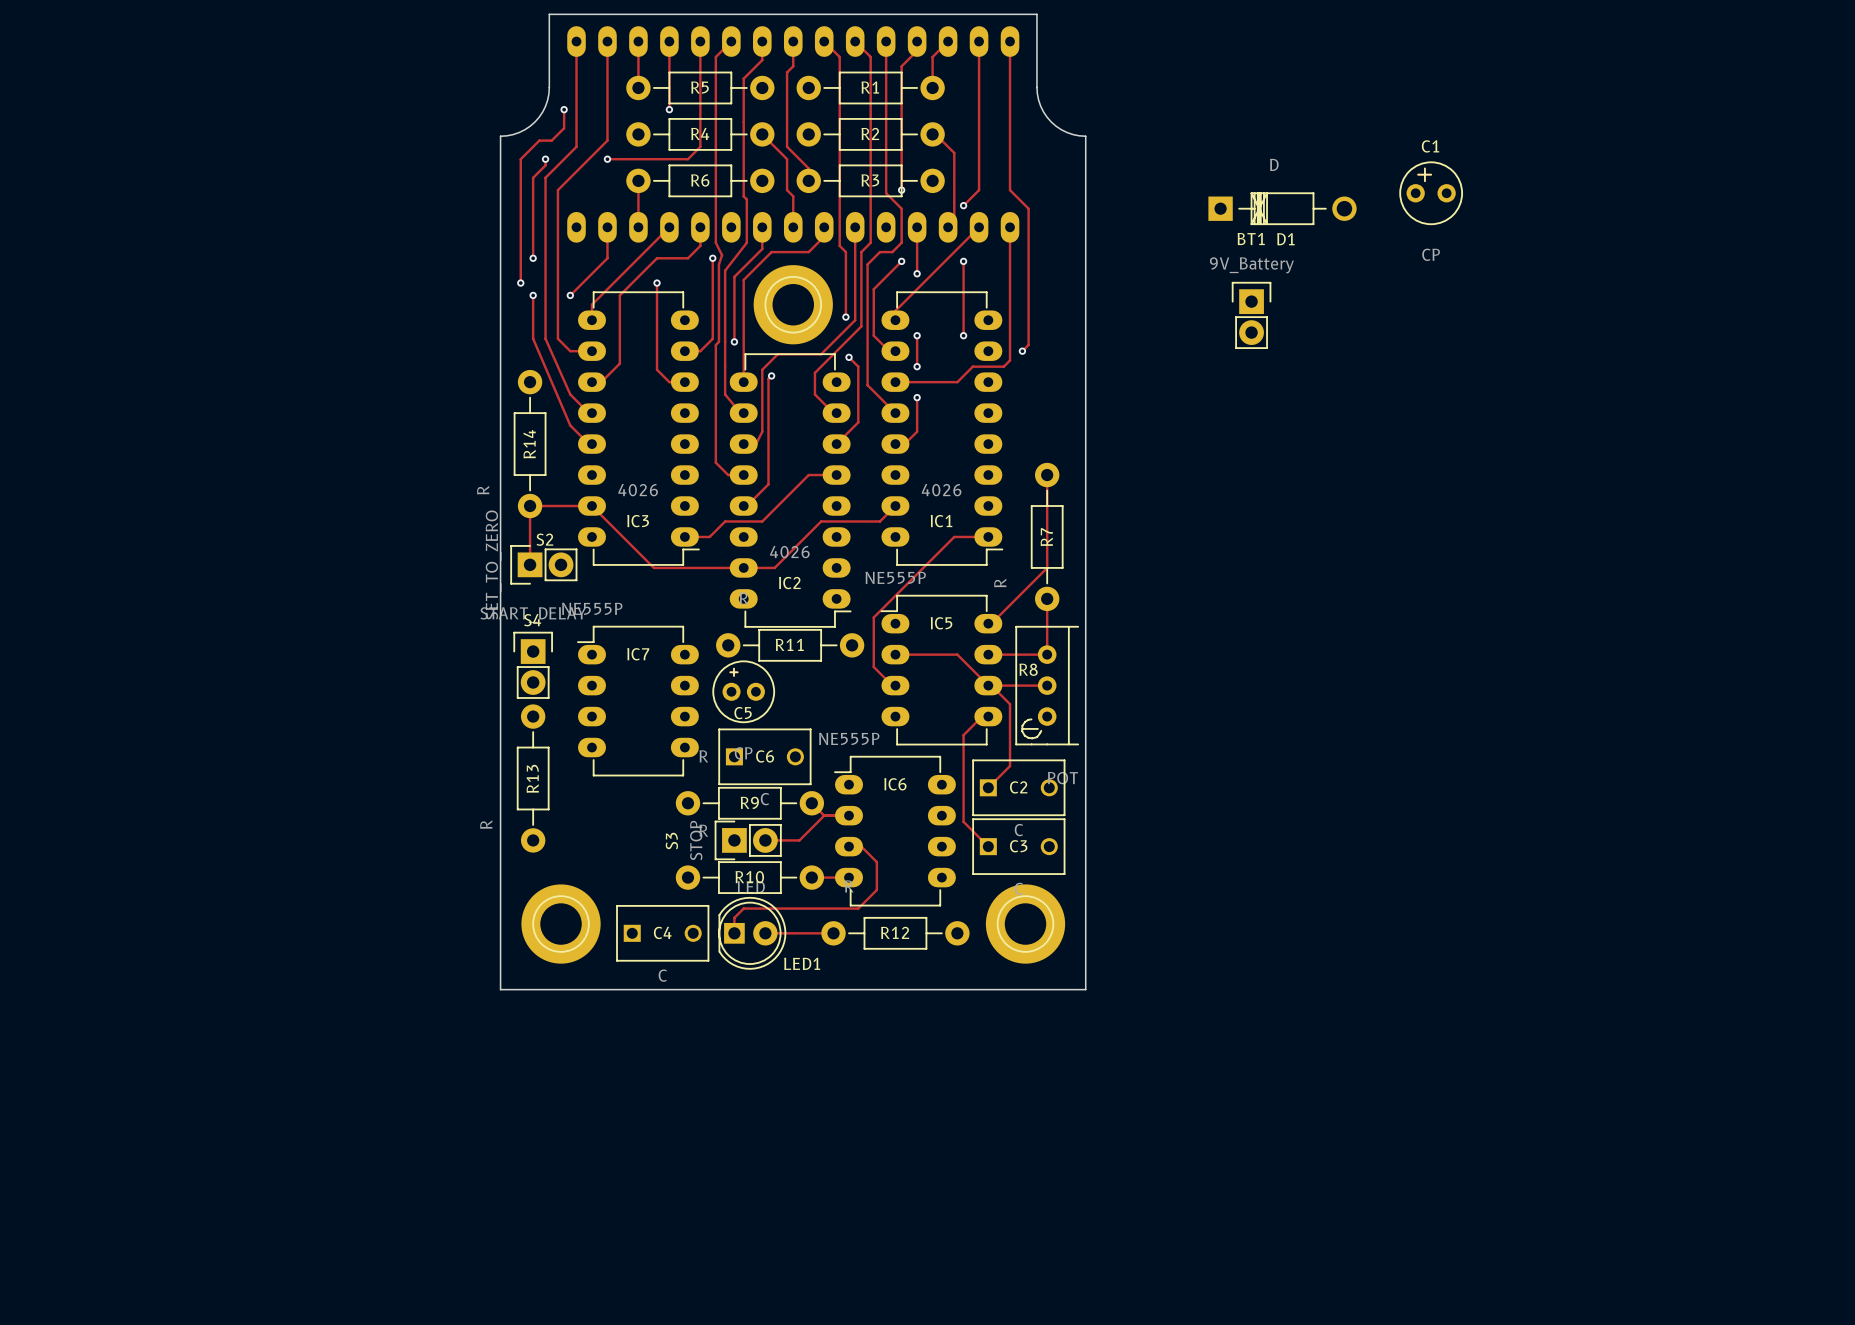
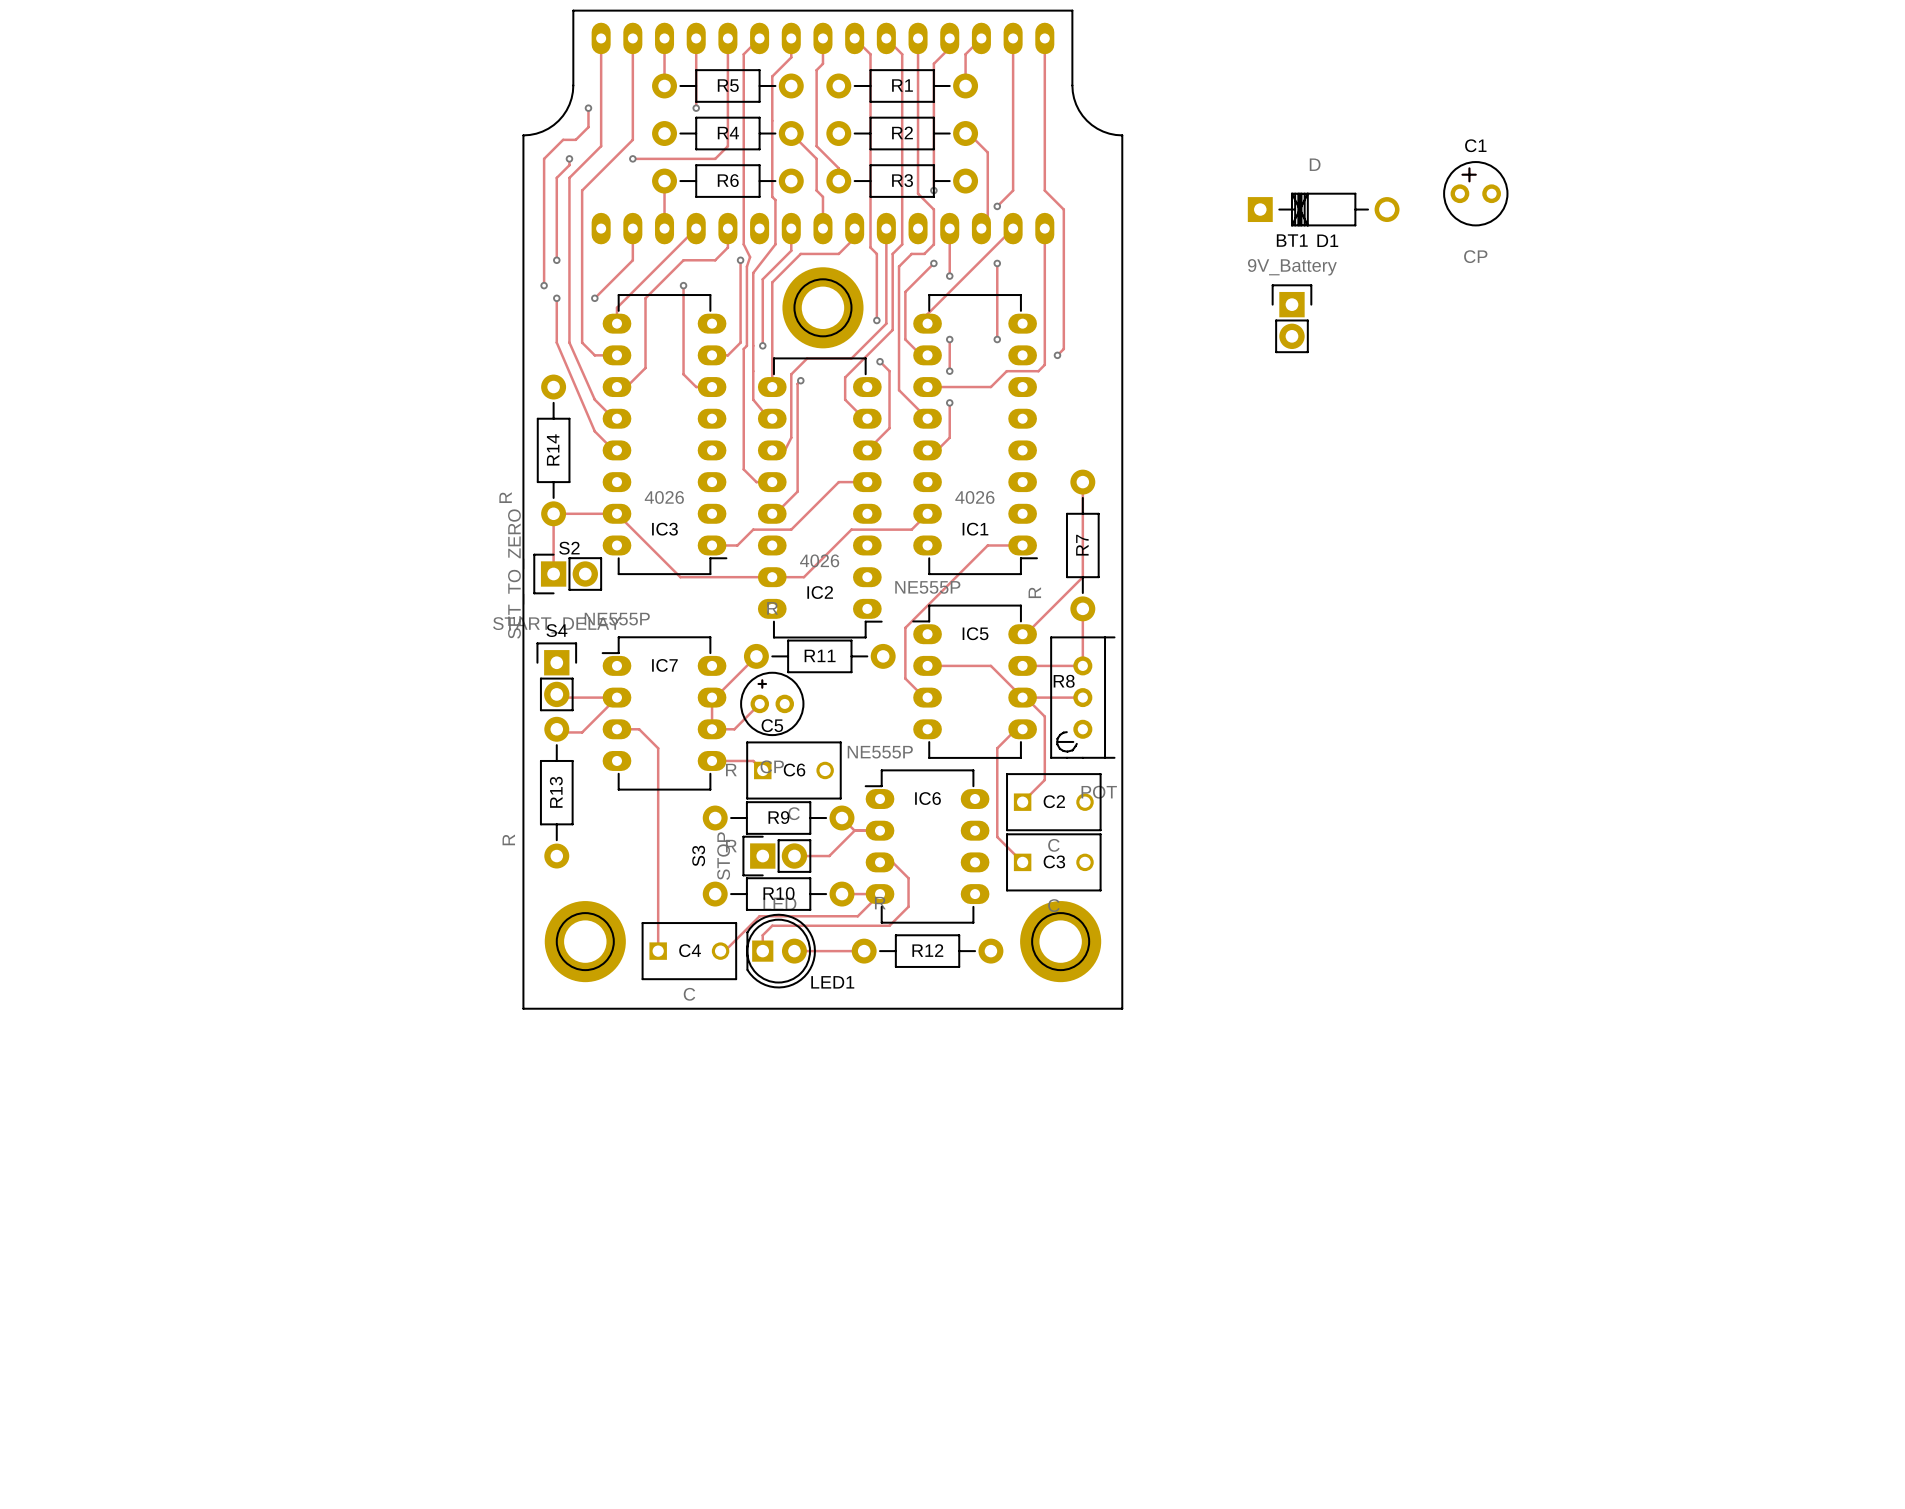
track: none -> (756, 656) (715, 697) (712, 697) (712, 729) (734, 729) (759, 703)
track: none -> (556, 697) (616, 697) (582, 732) (556, 732)
track: none -> (616, 729) (639, 729) (658, 748) (658, 951)
track: none -> (712, 760) (753, 760) (762, 770)
track: none -> (880, 894) (857, 916) (759, 916) (724, 951) (720, 951)

